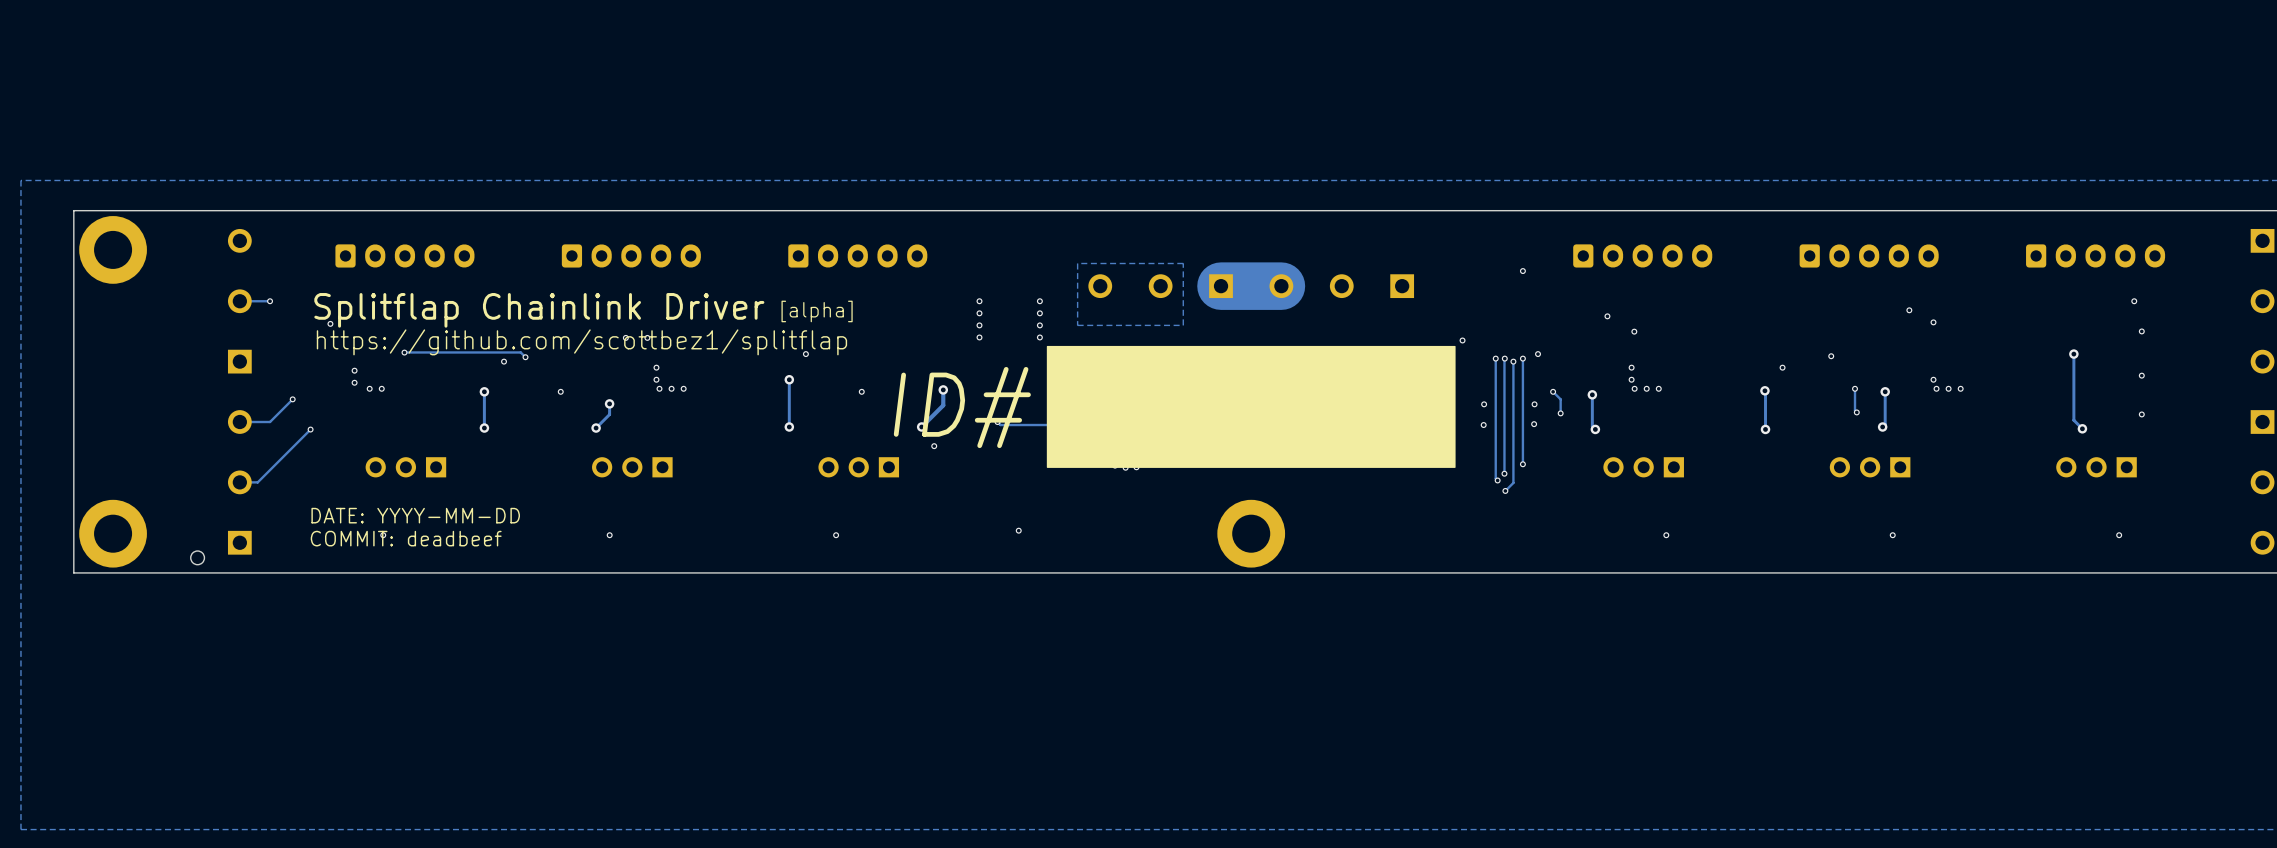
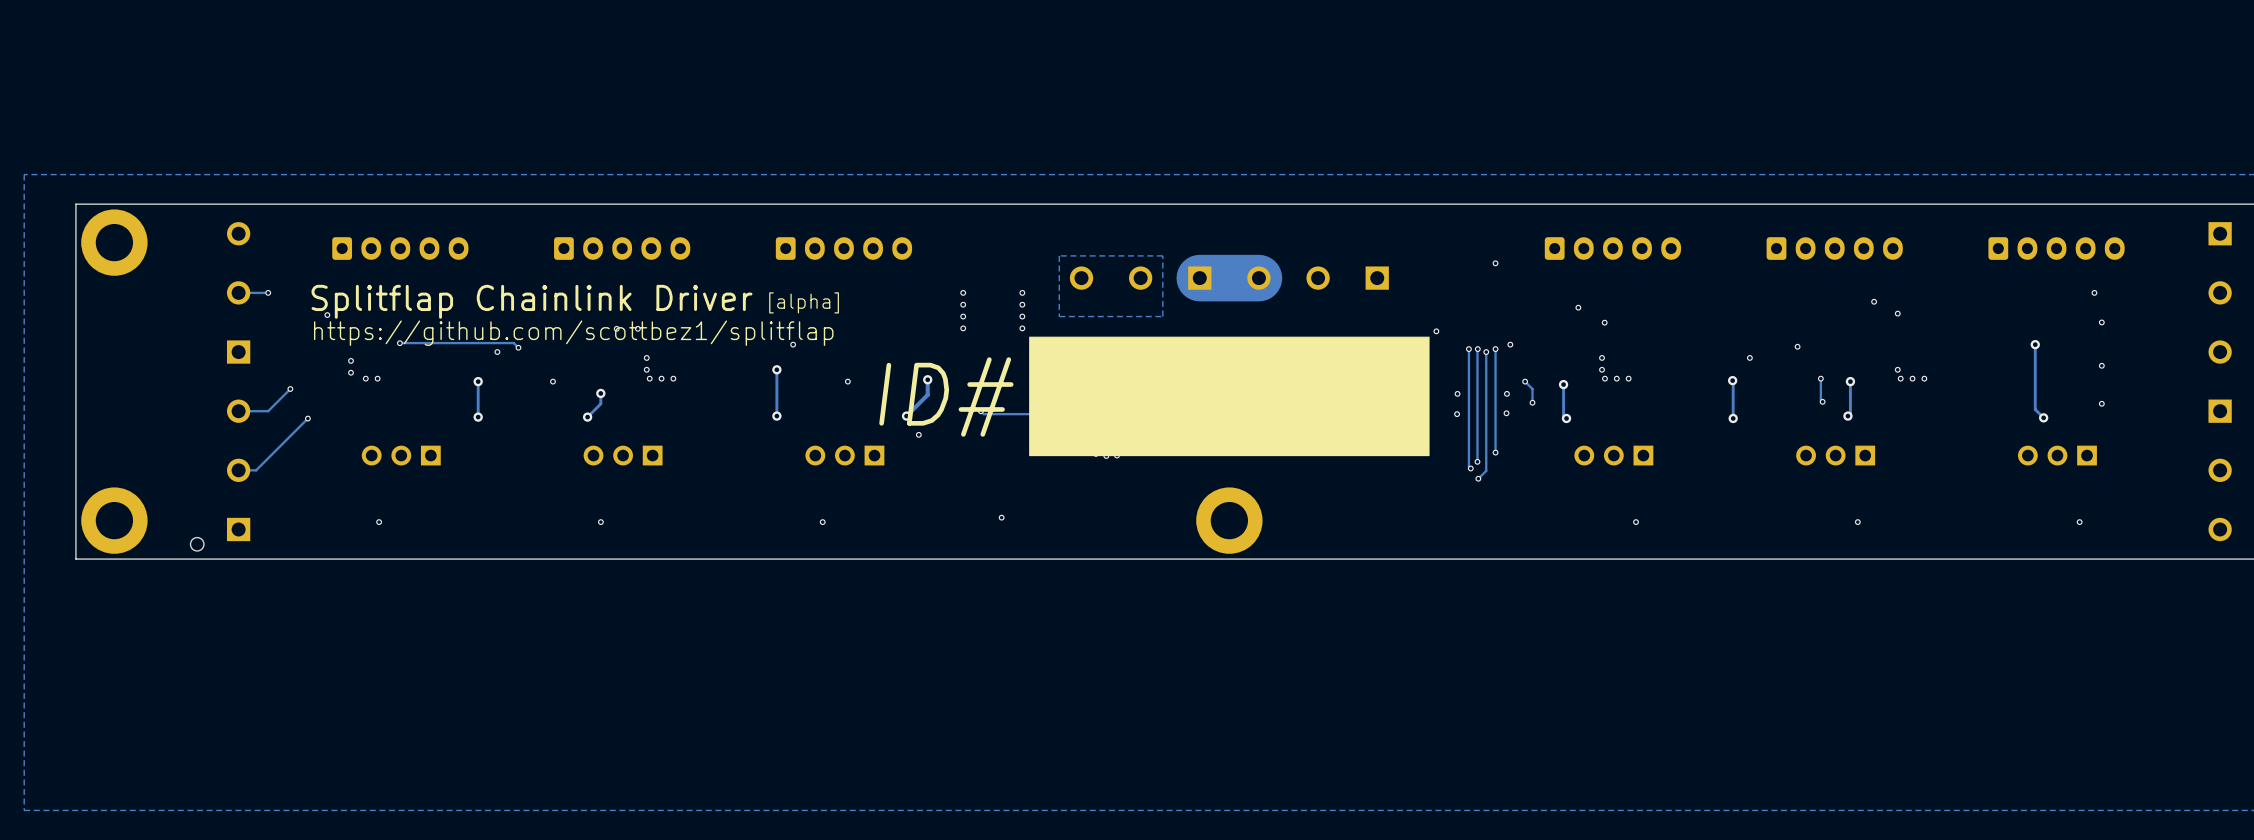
text: DATE: YYYY-MM-DD (415, 515) -> none
text: COMMIT: deadbeef (406, 538) -> none

